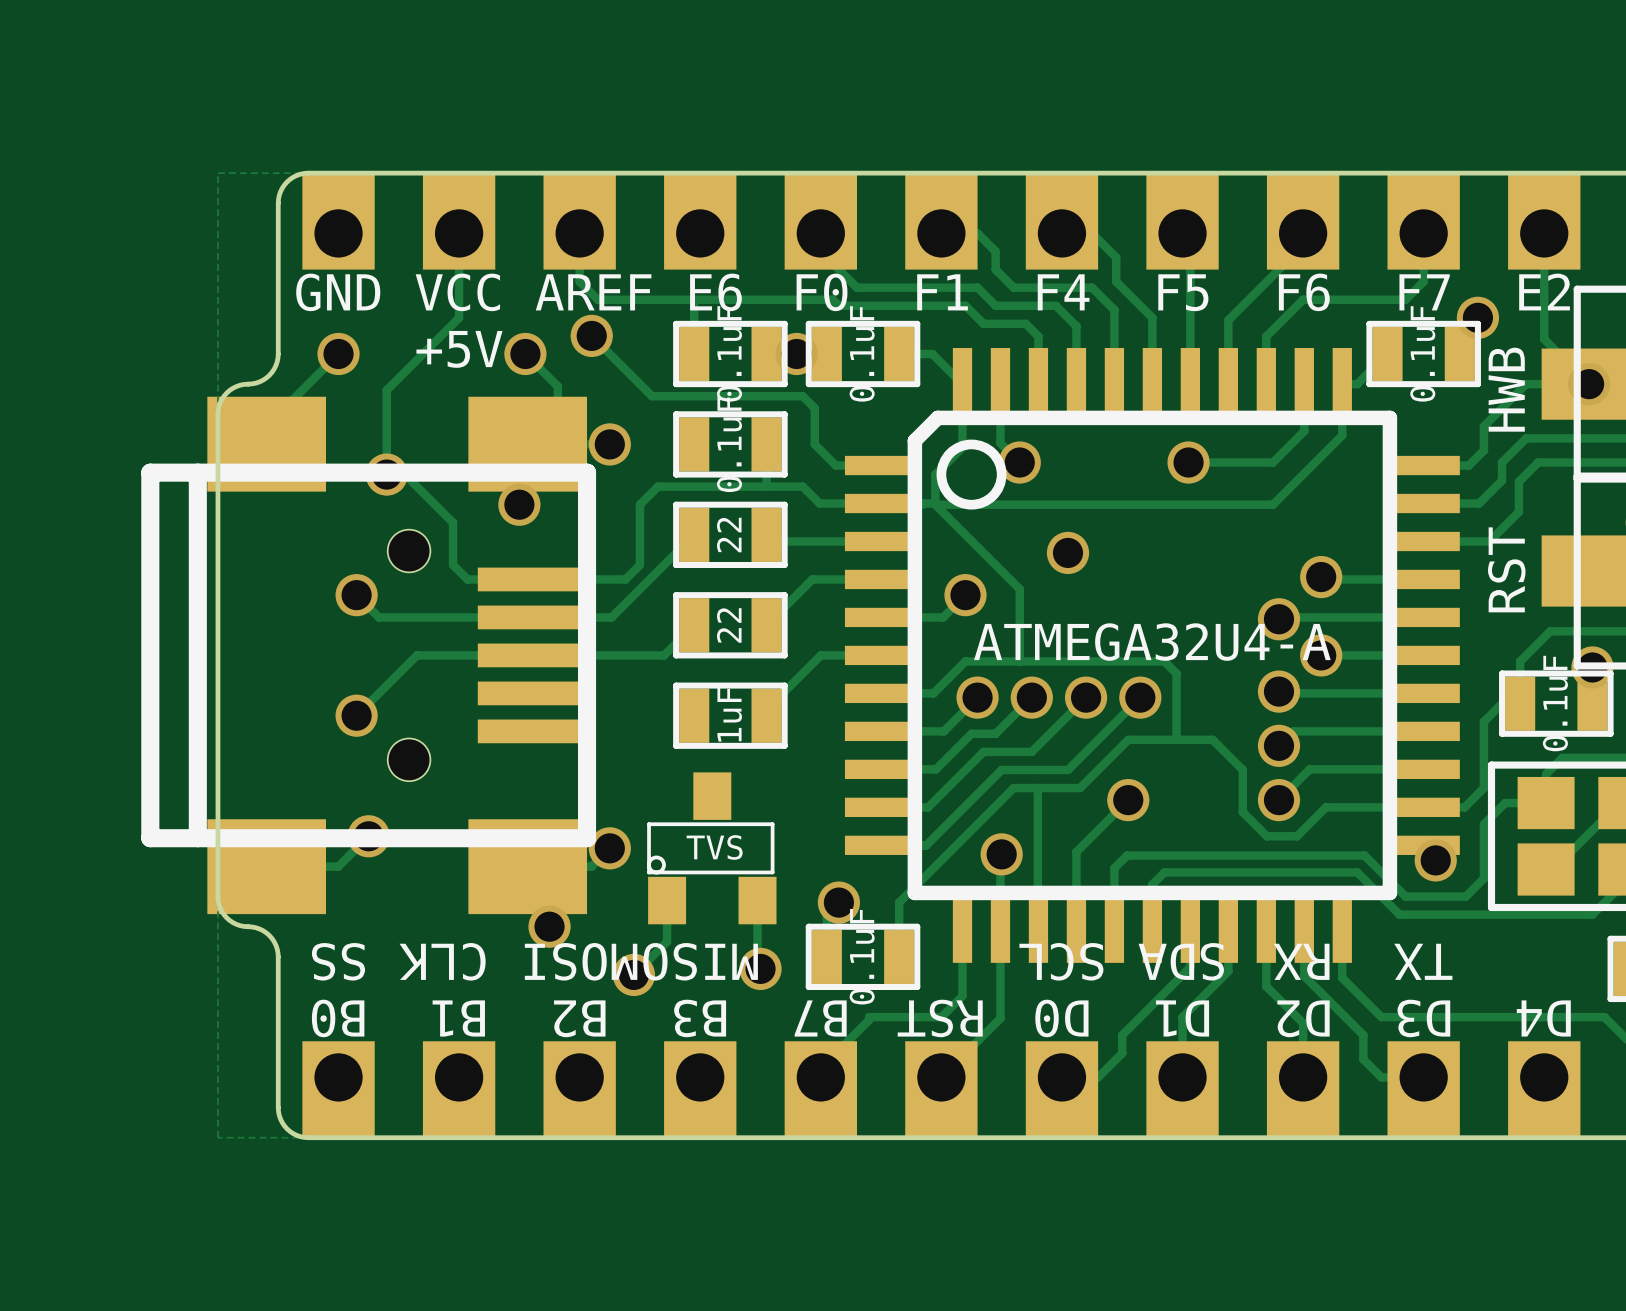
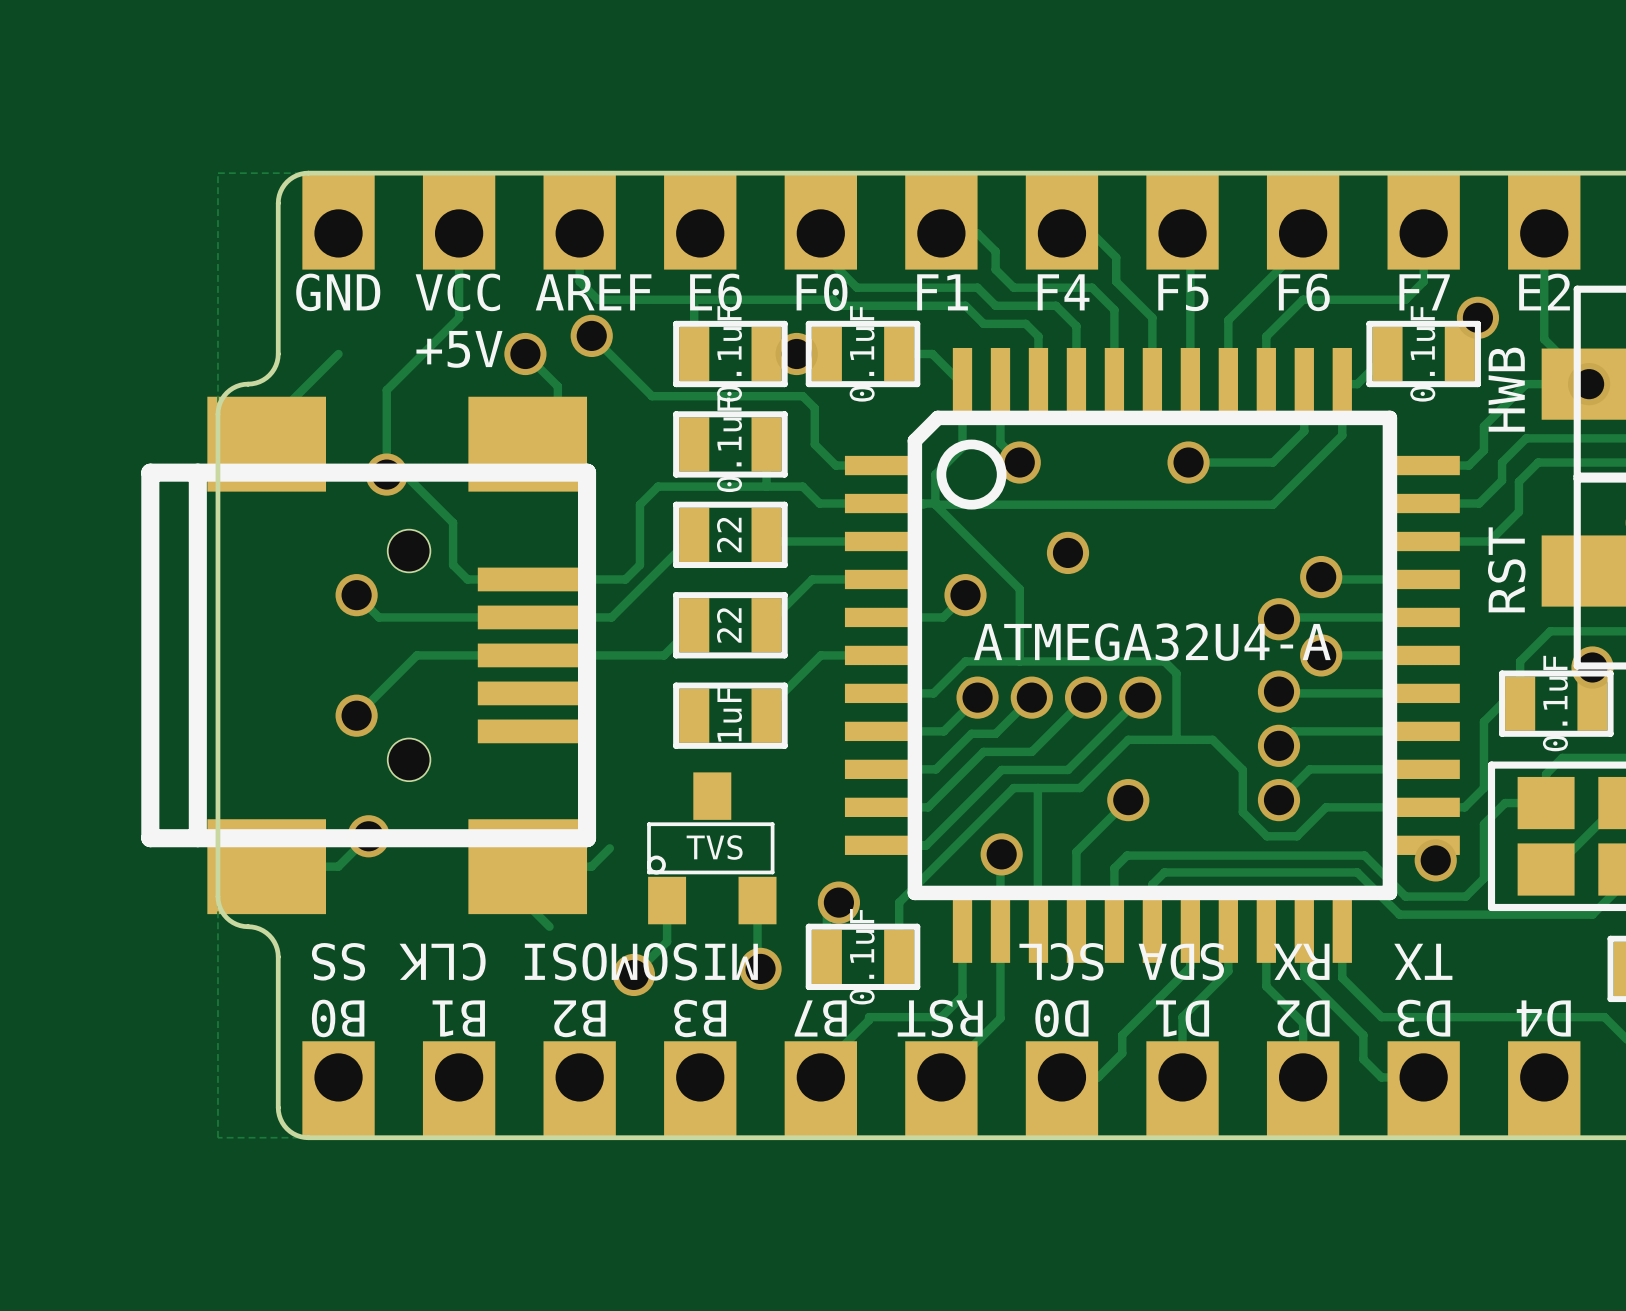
via: (338, 354) -> none
via: (609, 444) -> none
via: (519, 504) -> none
via: (609, 848) -> none
via: (549, 926) -> none

